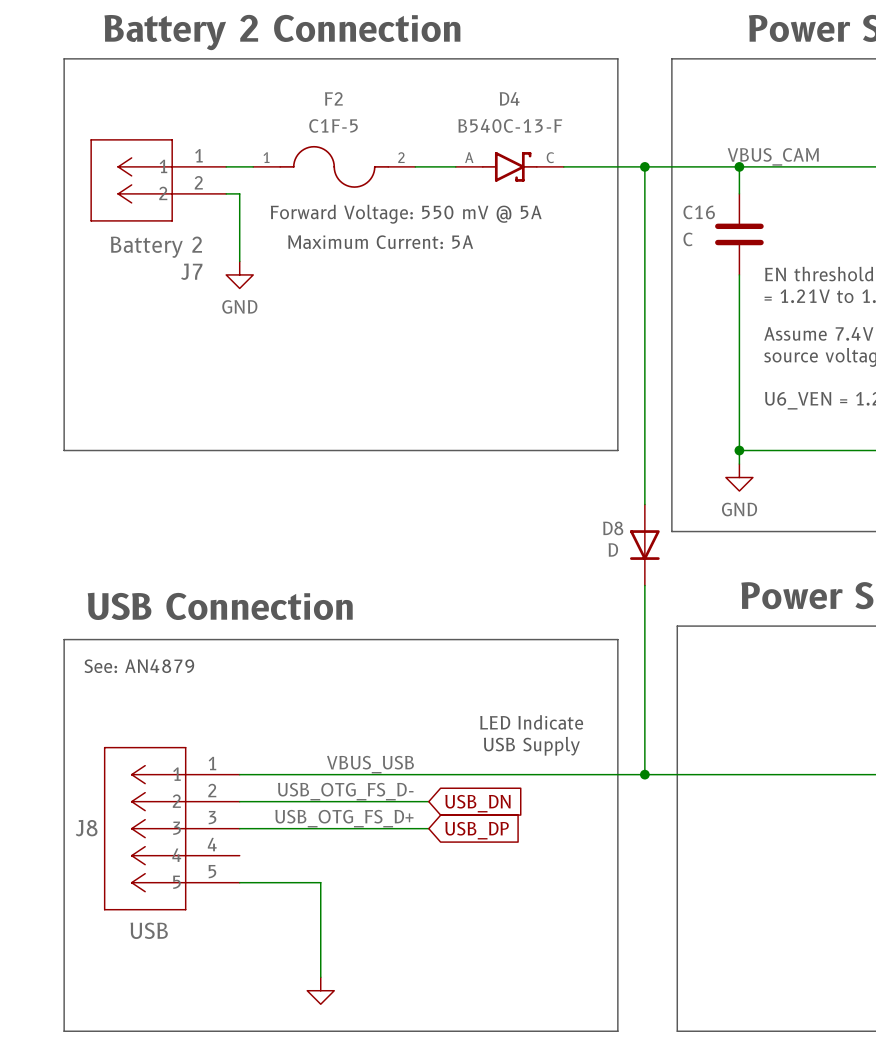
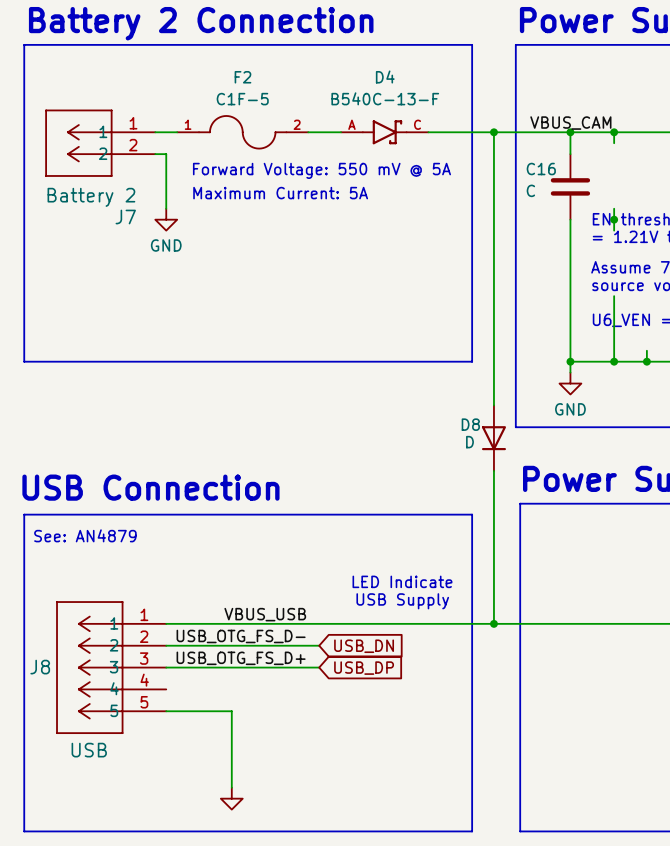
label position: VBUS_CAM (773, 156) -> VBUS_CAM (570, 123)
wire: none -> (614, 132) (614, 143)
junction: none -> (614, 132)
wire: none -> (614, 208) (614, 230)
junction: none -> (614, 219)
wire: none -> (614, 296) (614, 361)
wire: none -> (646, 350) (646, 361)
junction: none -> (614, 361)
junction: none -> (646, 361)

